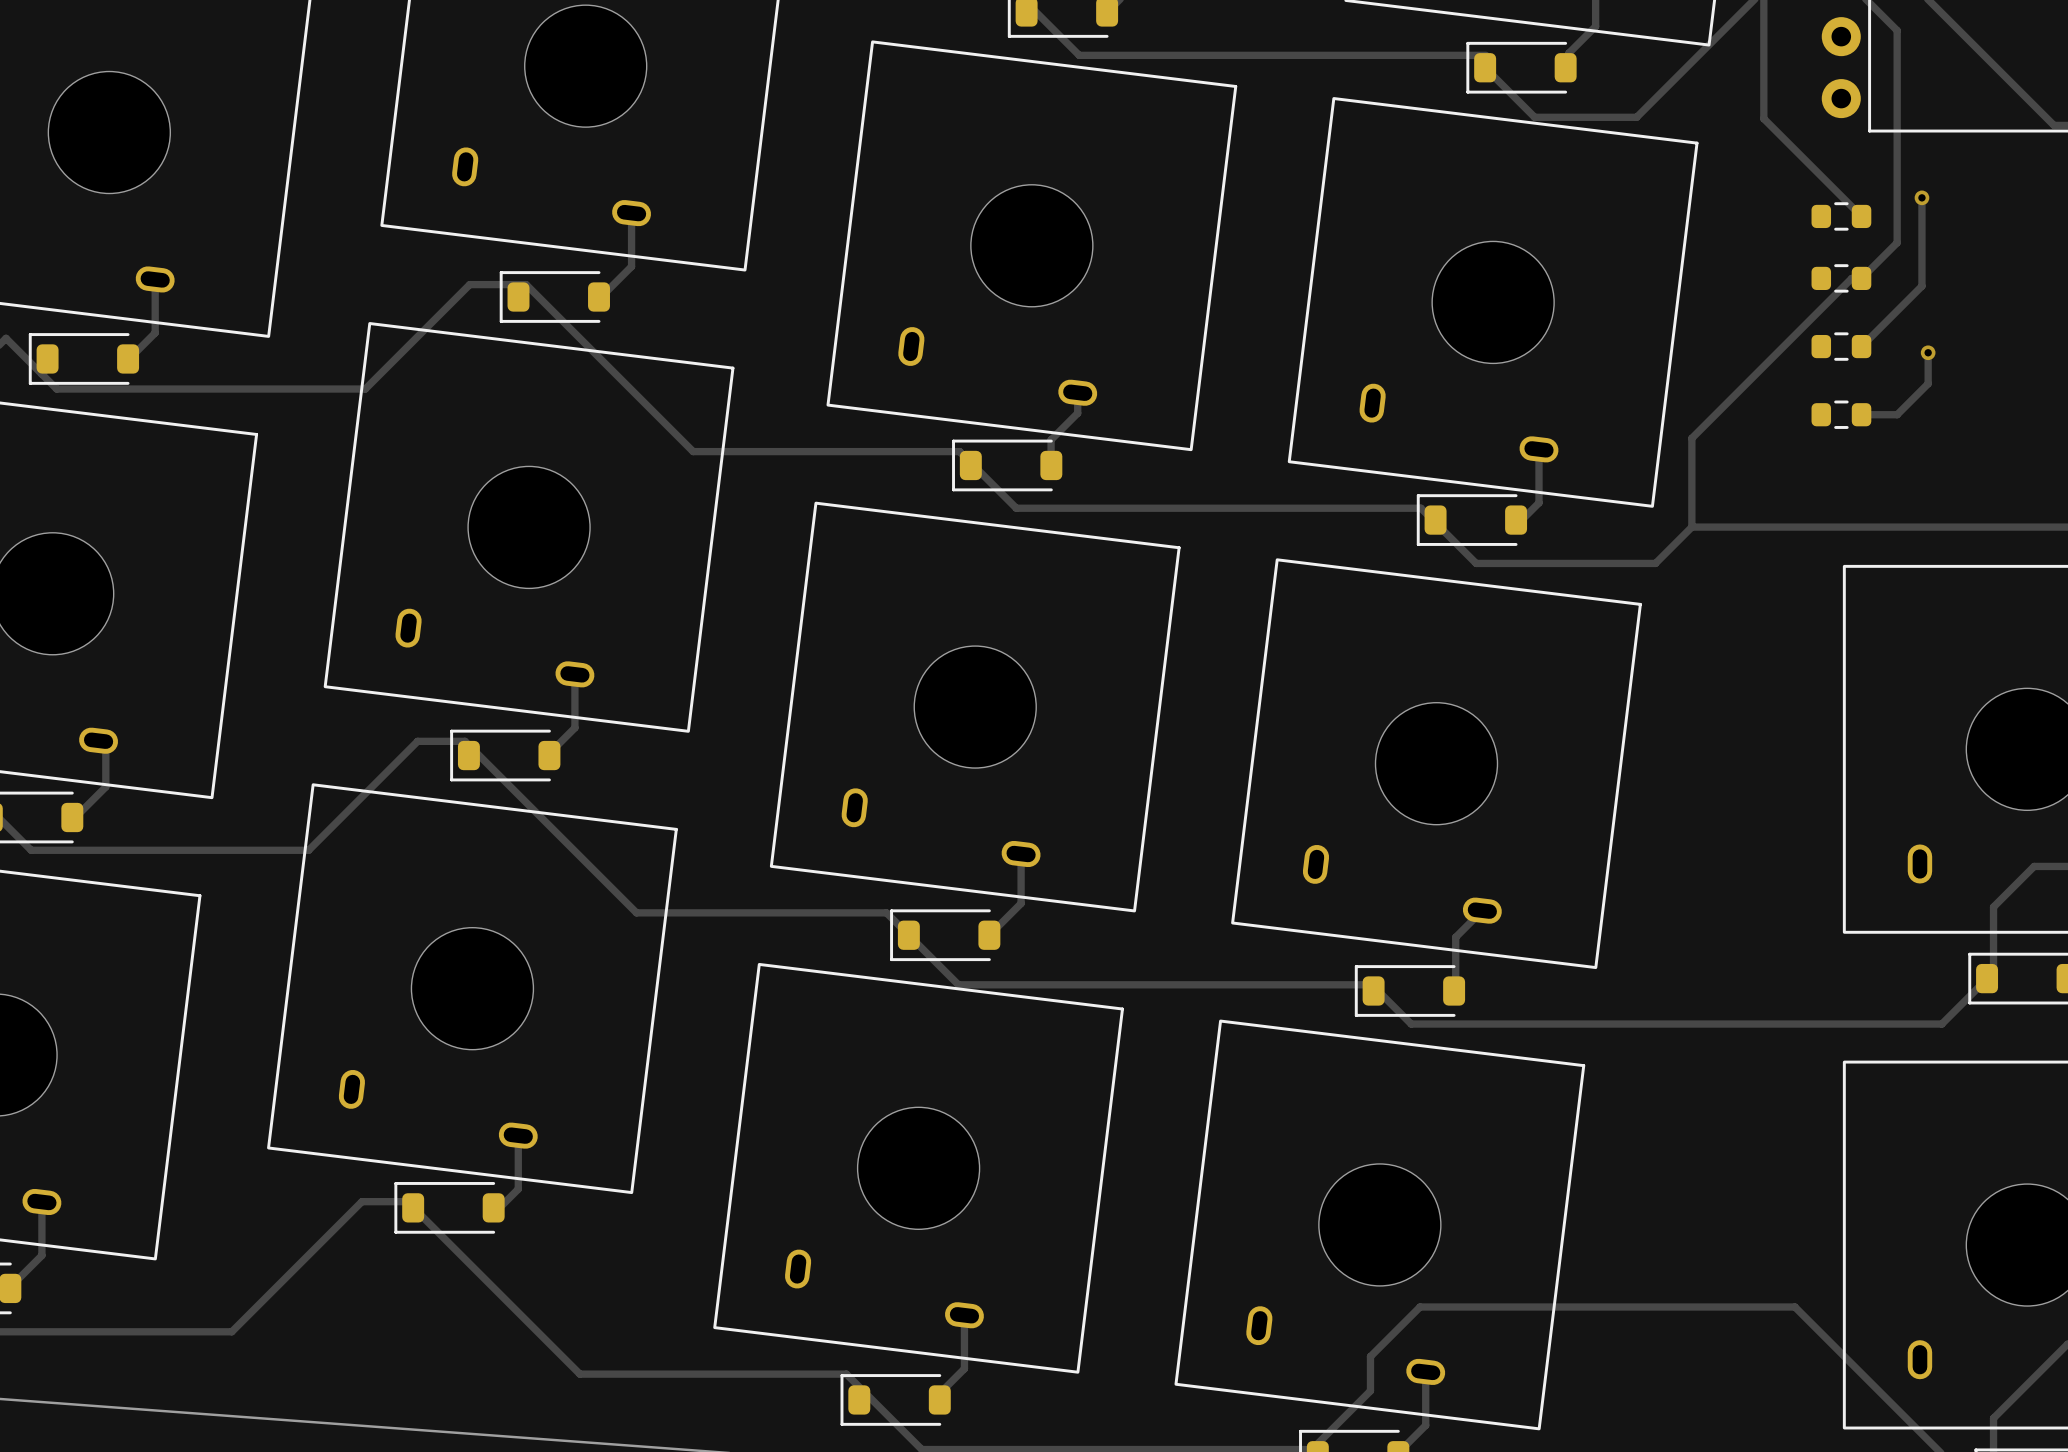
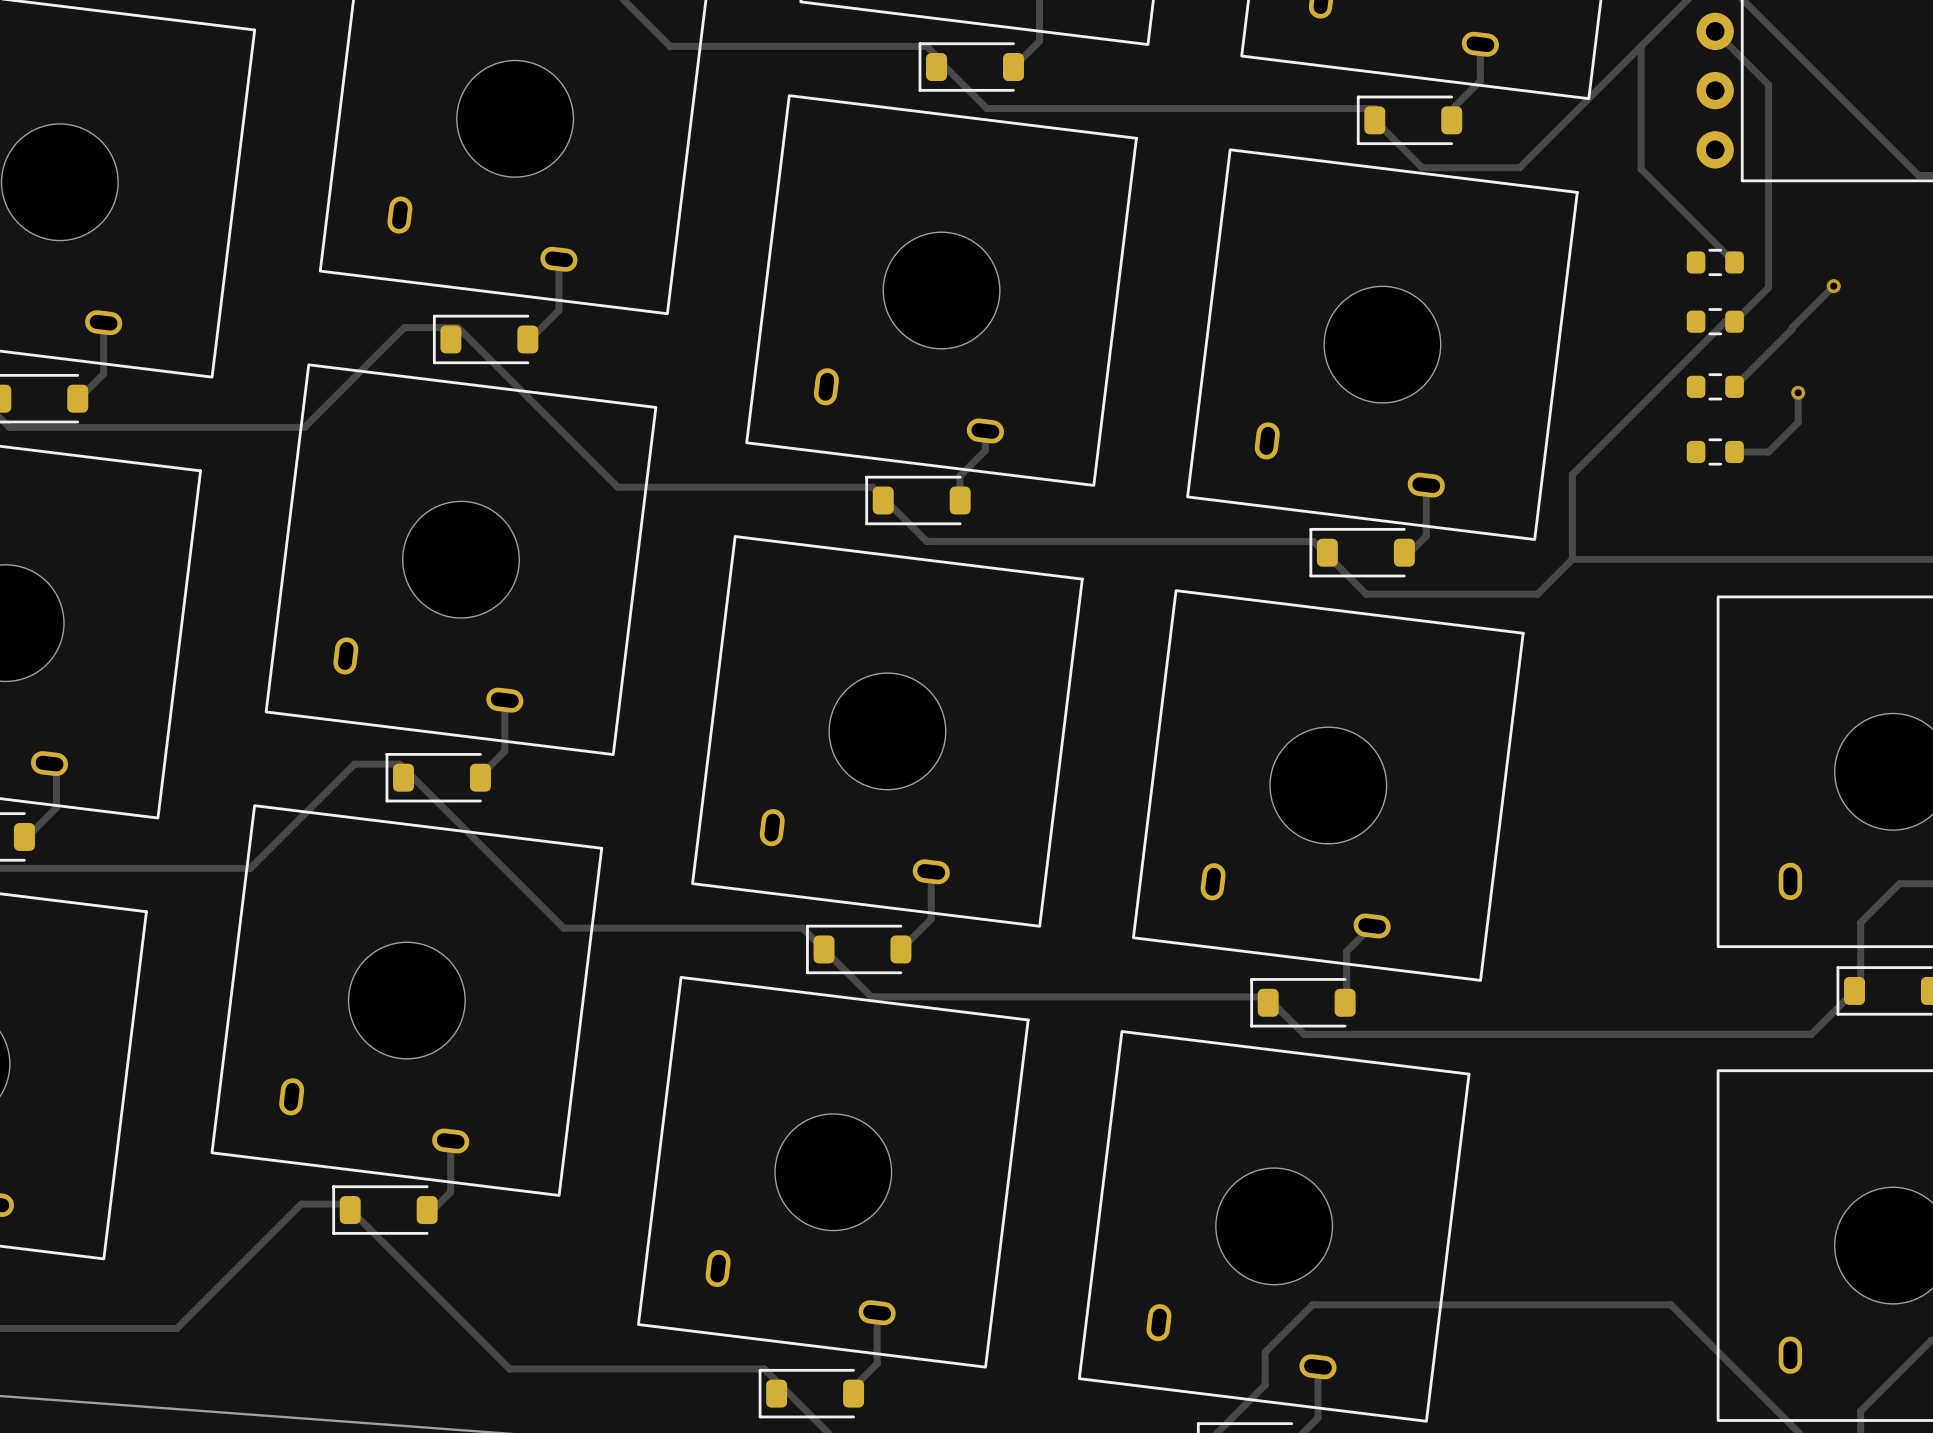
track: (1921, 197) (1921, 284) -> (1833, 286) (1792, 327)
via position: (1921, 197) -> (1833, 286)

